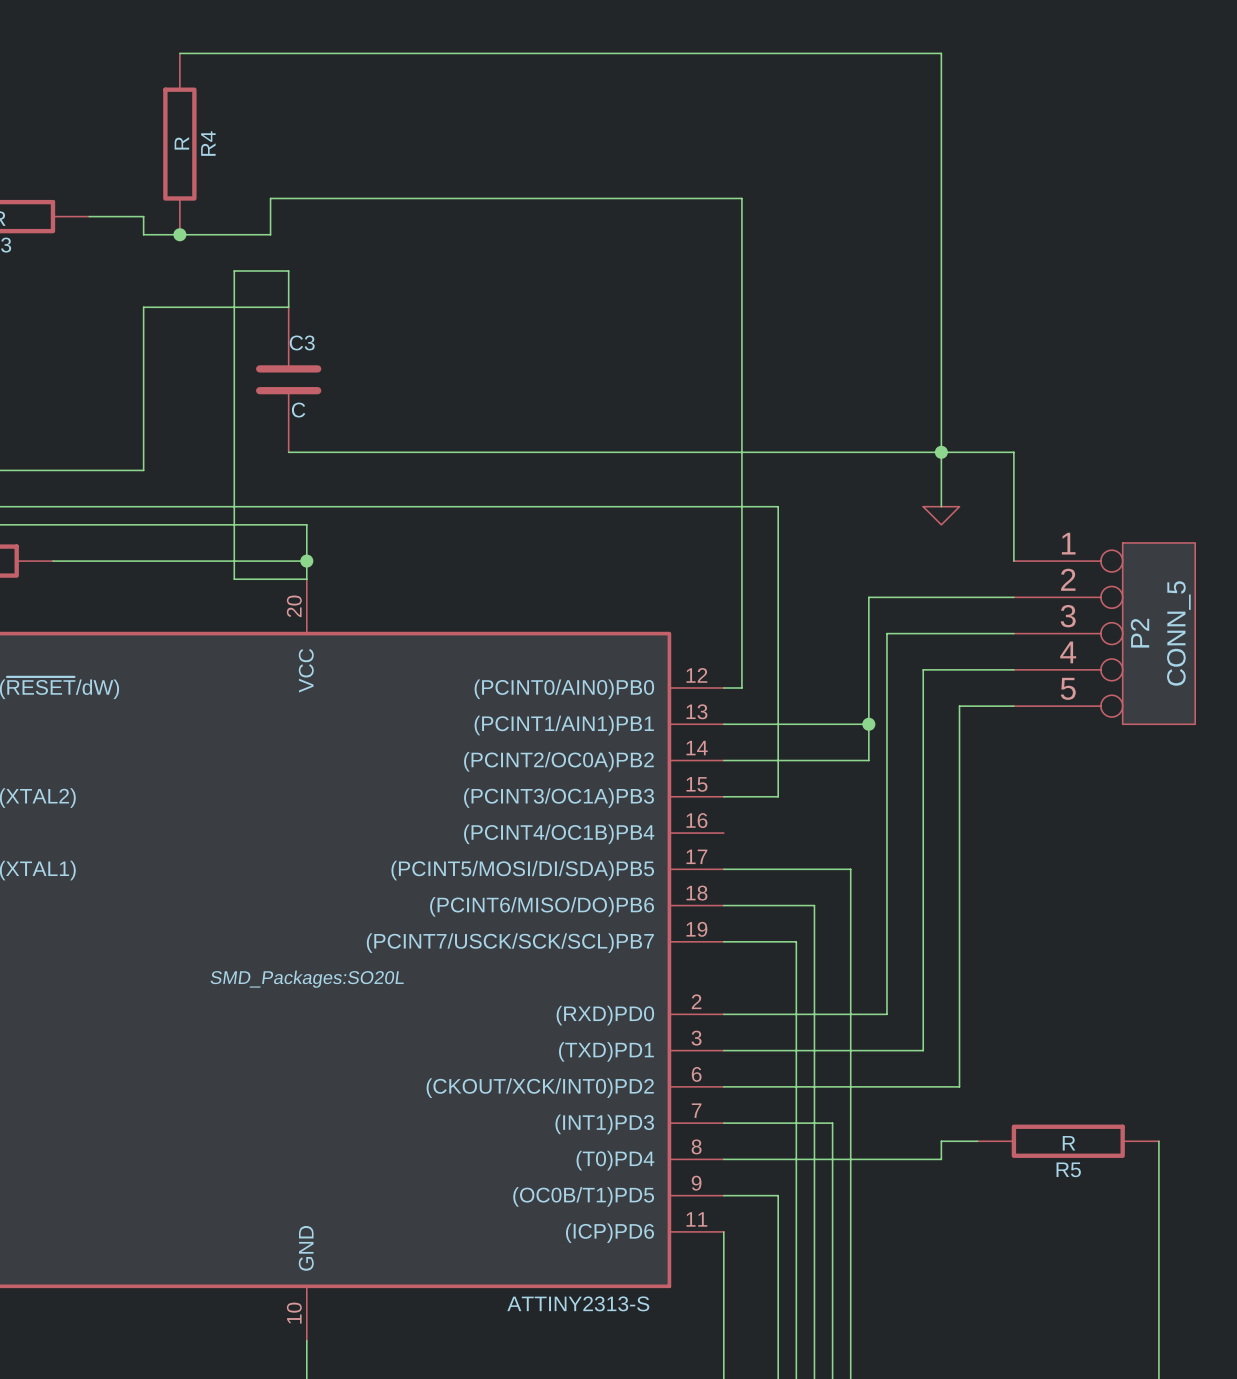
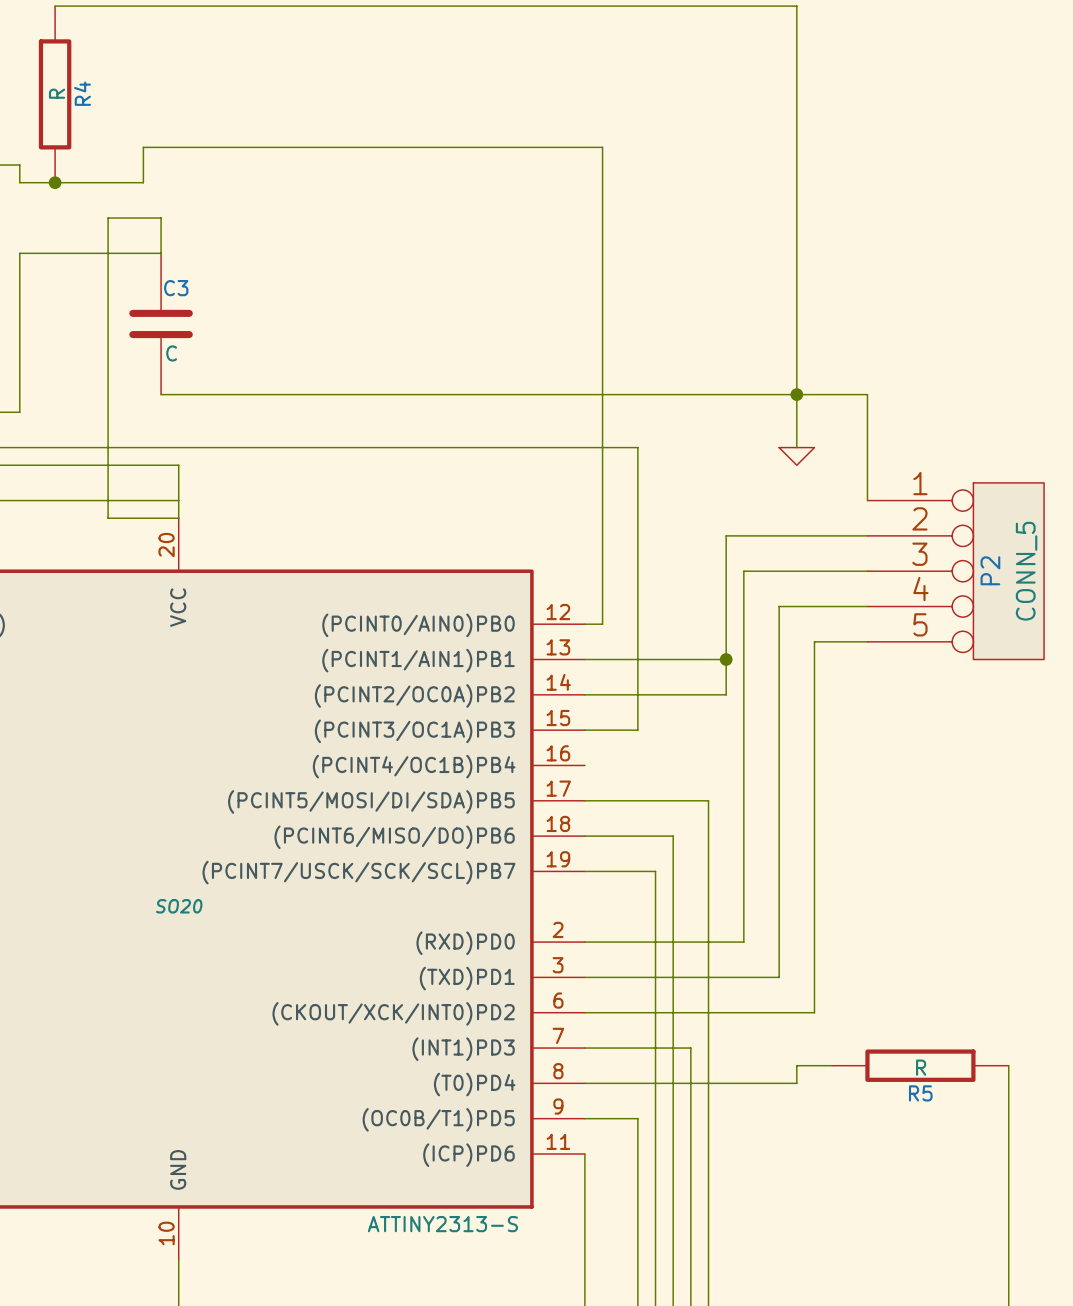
junction: (306, 561) -> none
part text: SMD_Packages:SO20L (307, 979) -> SO20 (179, 906)

